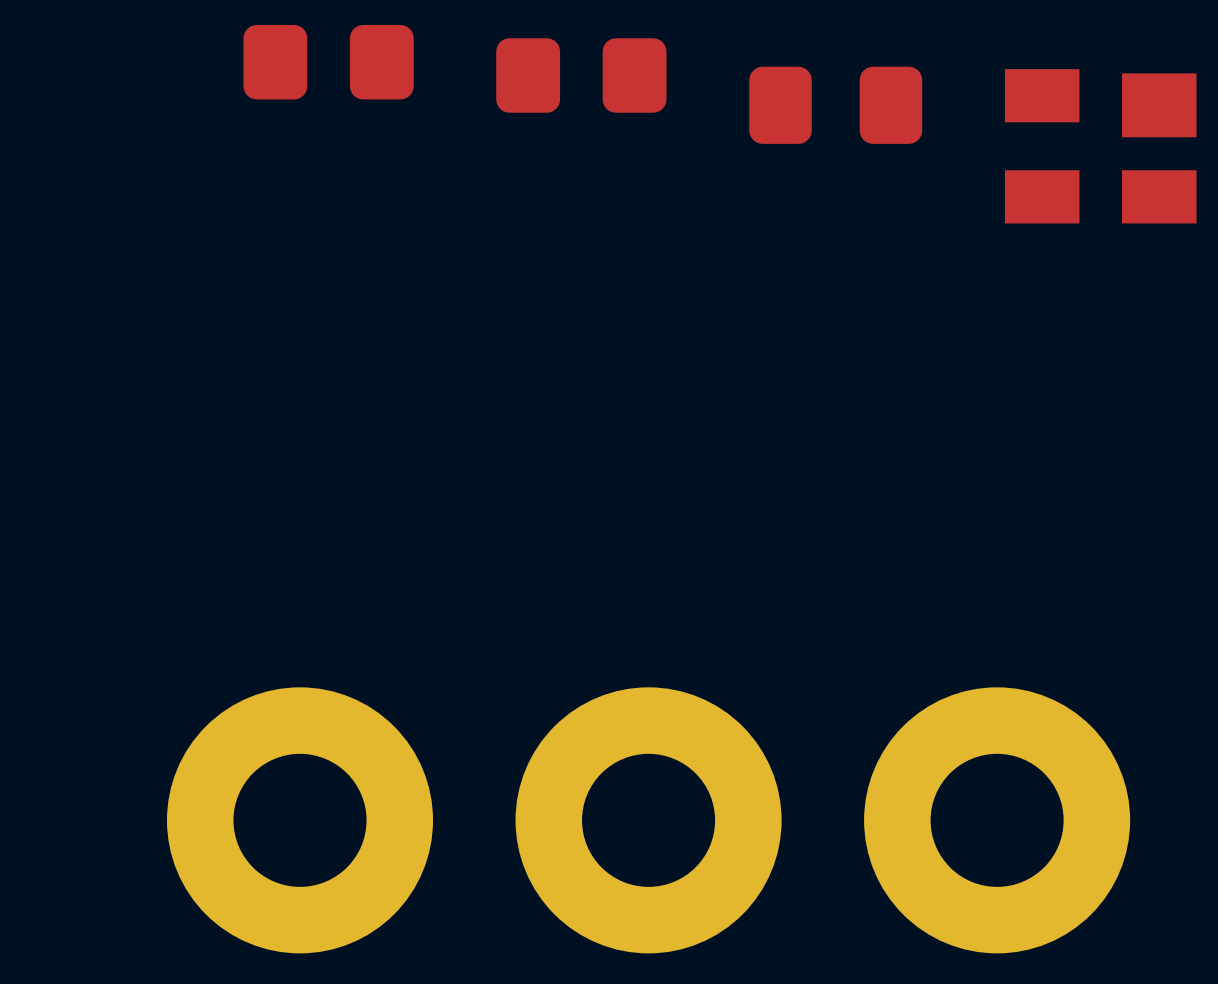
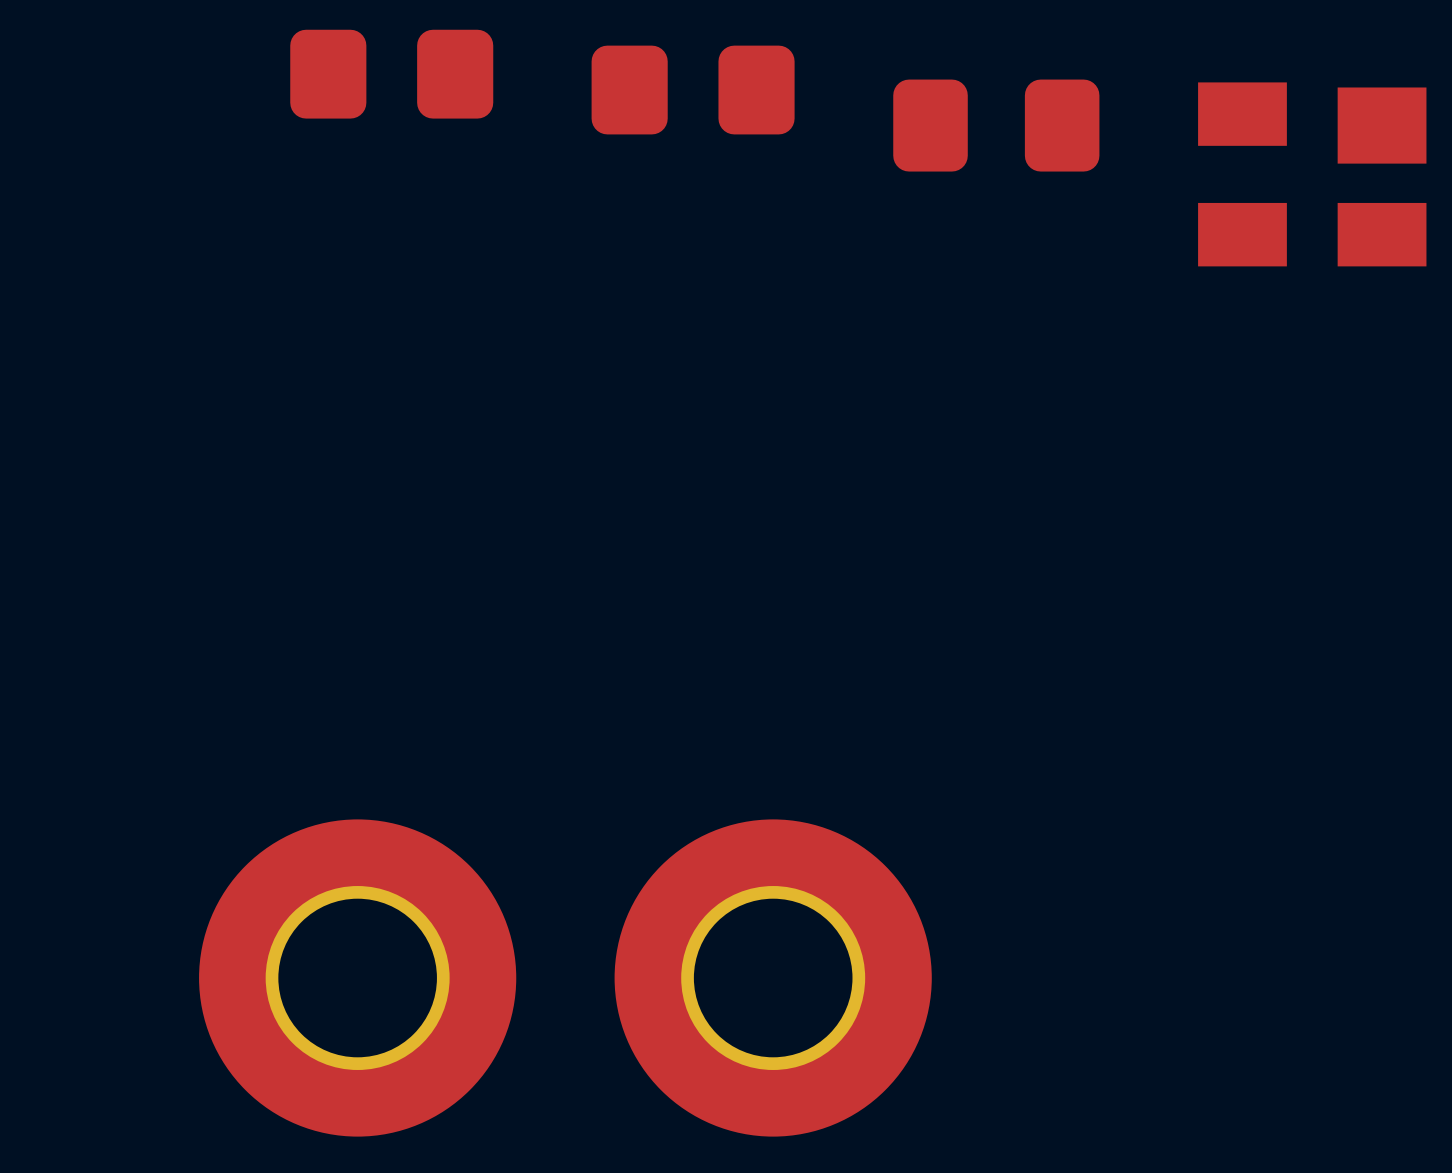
part footprint: [166, 687, 434, 954] -> [199, 819, 517, 1137]
part footprint: [515, 687, 782, 954] -> [614, 819, 932, 1137]
part: (997, 820) -> none

